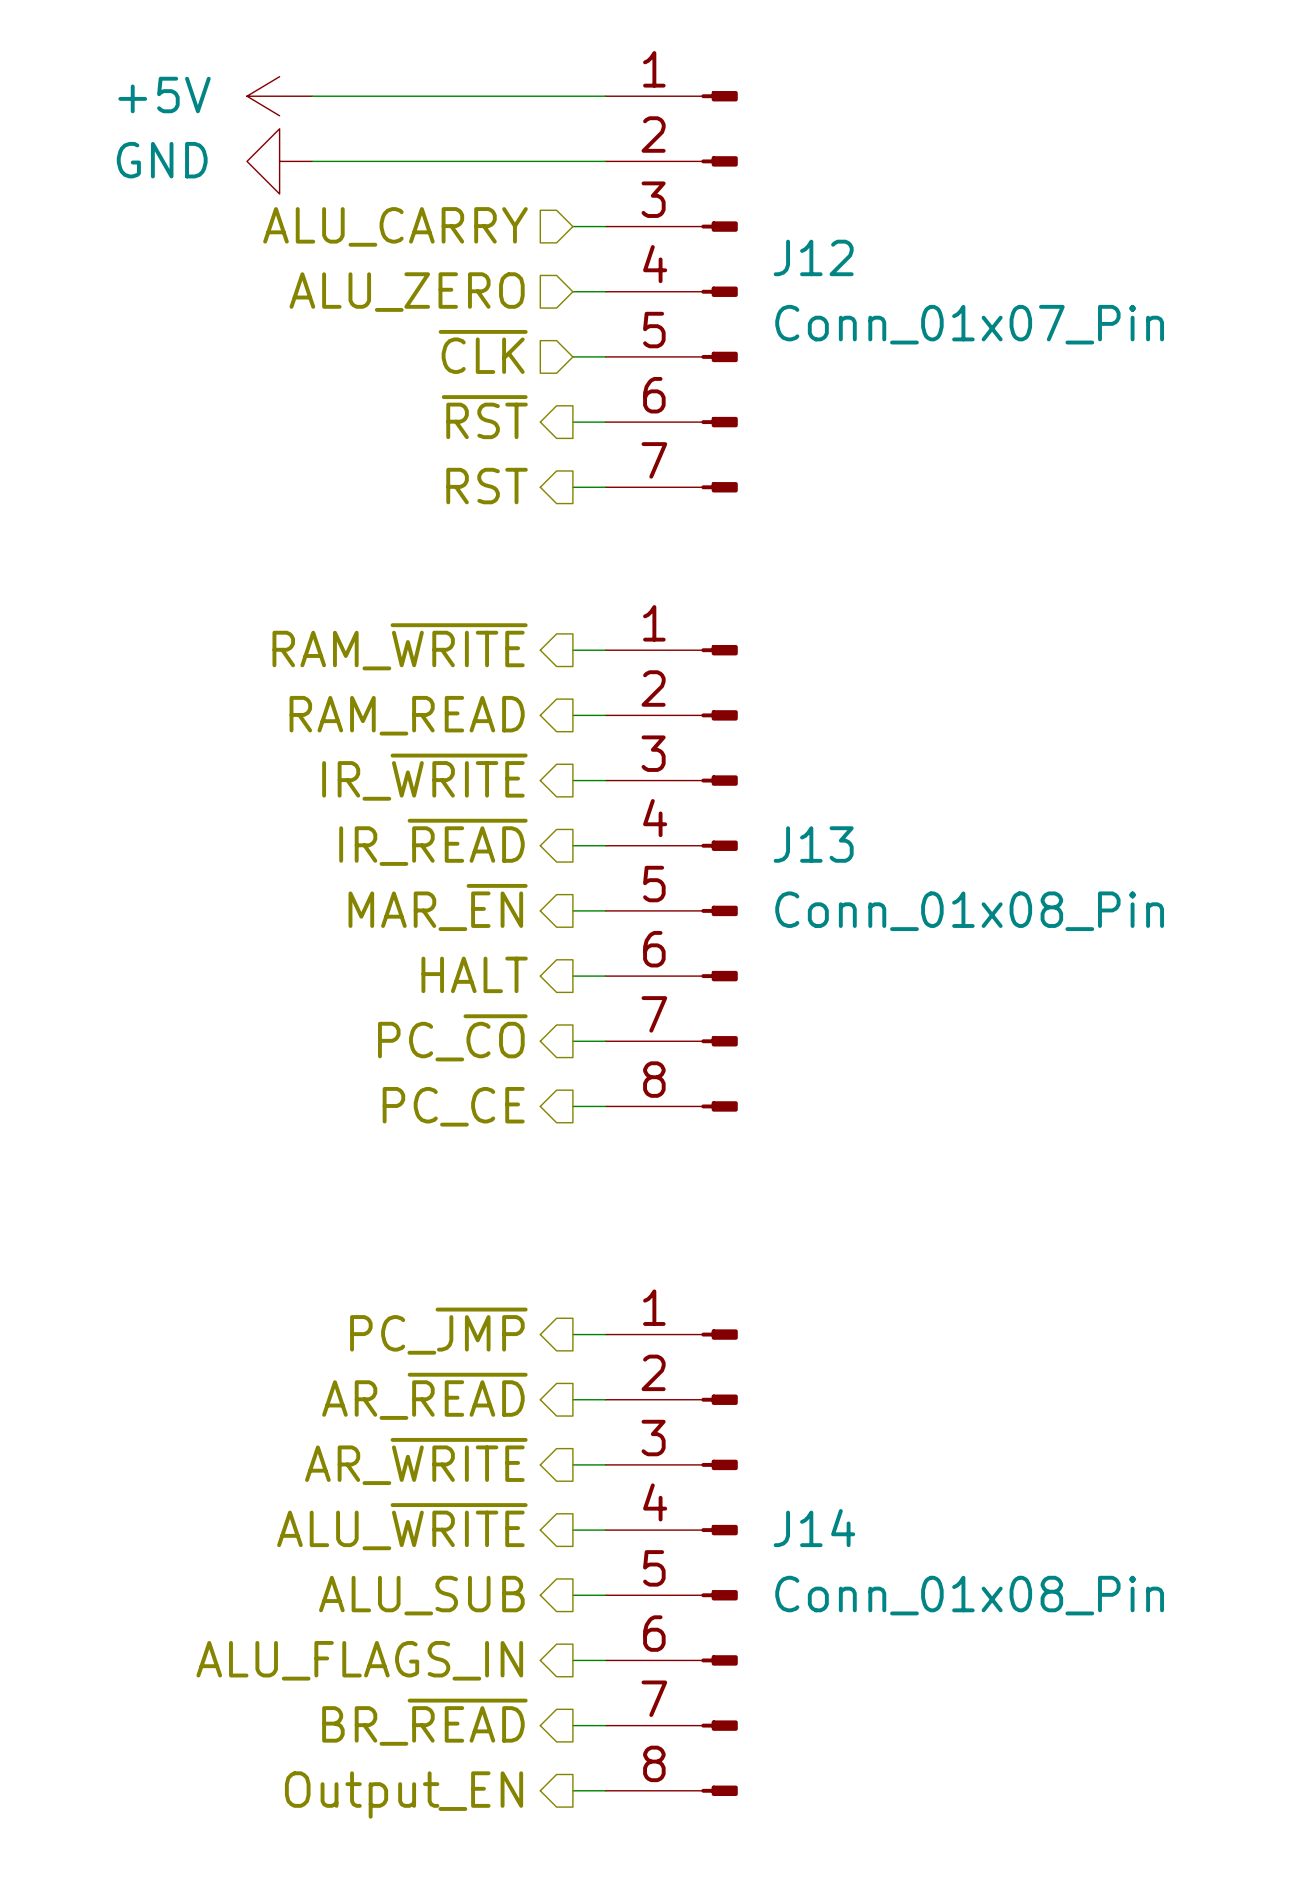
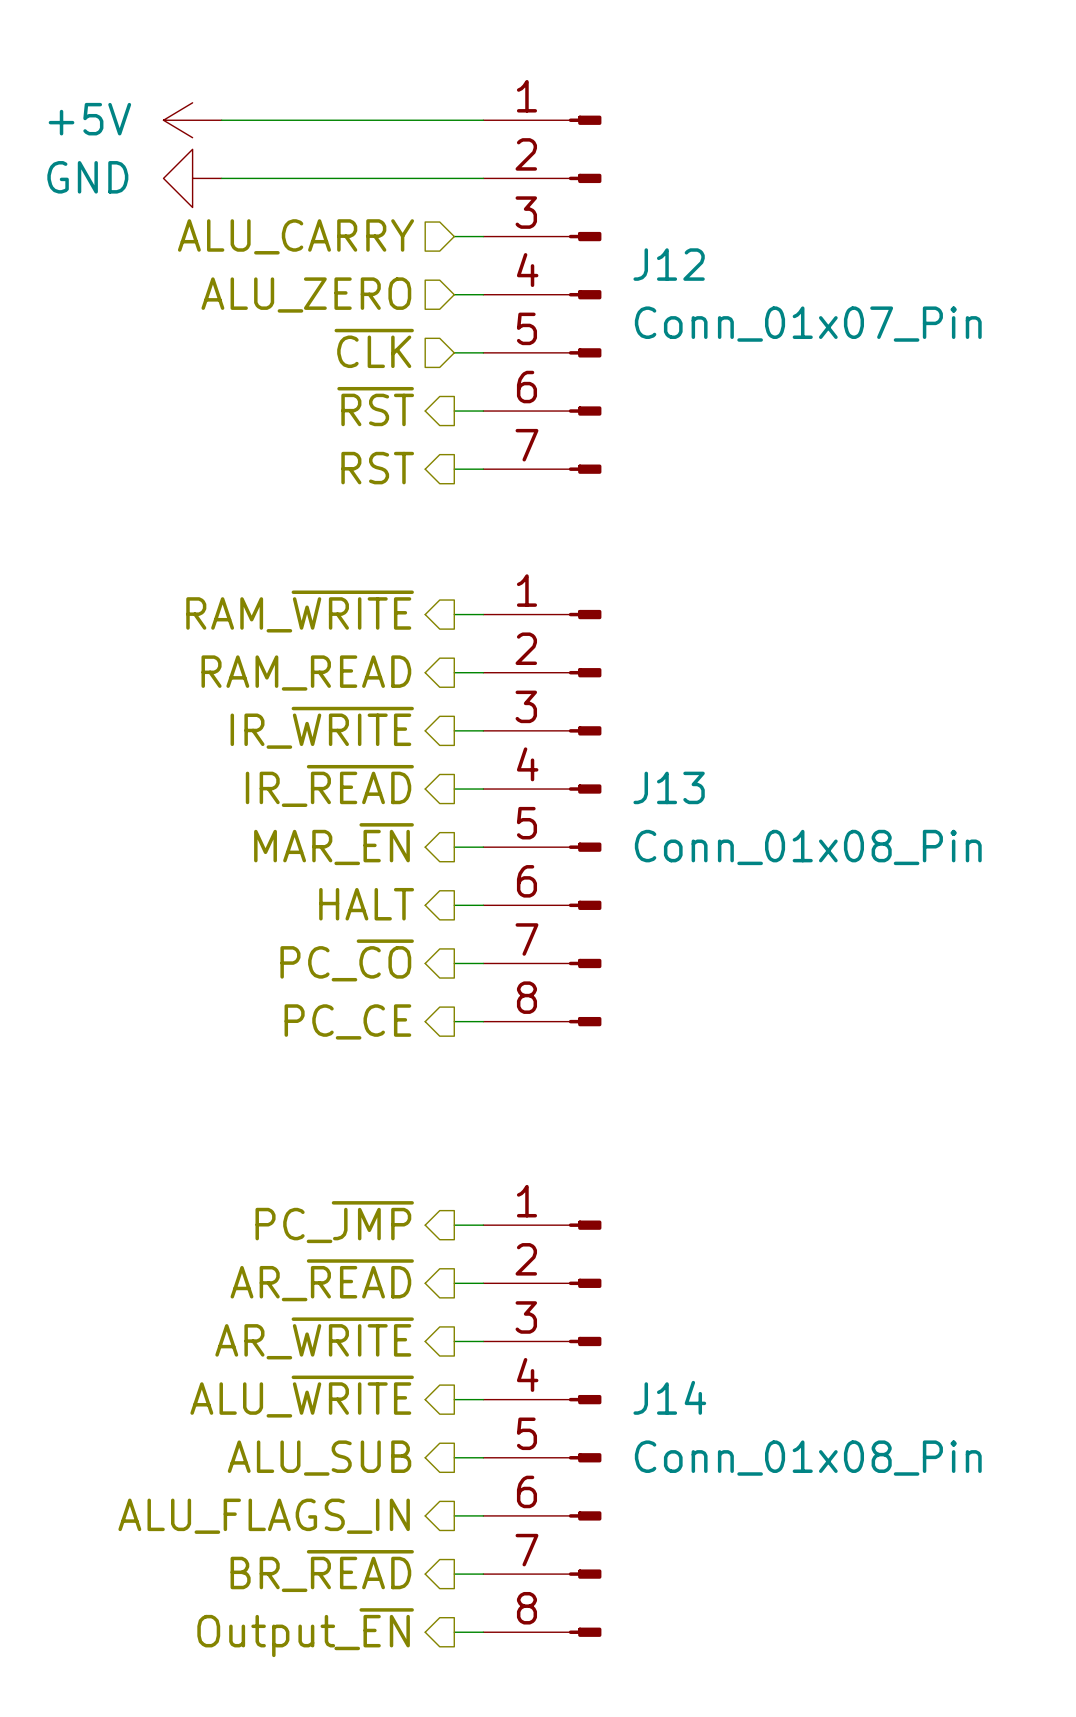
hierarchical label: Output_EN (404, 1795) -> Output_~{EN} (305, 1632)

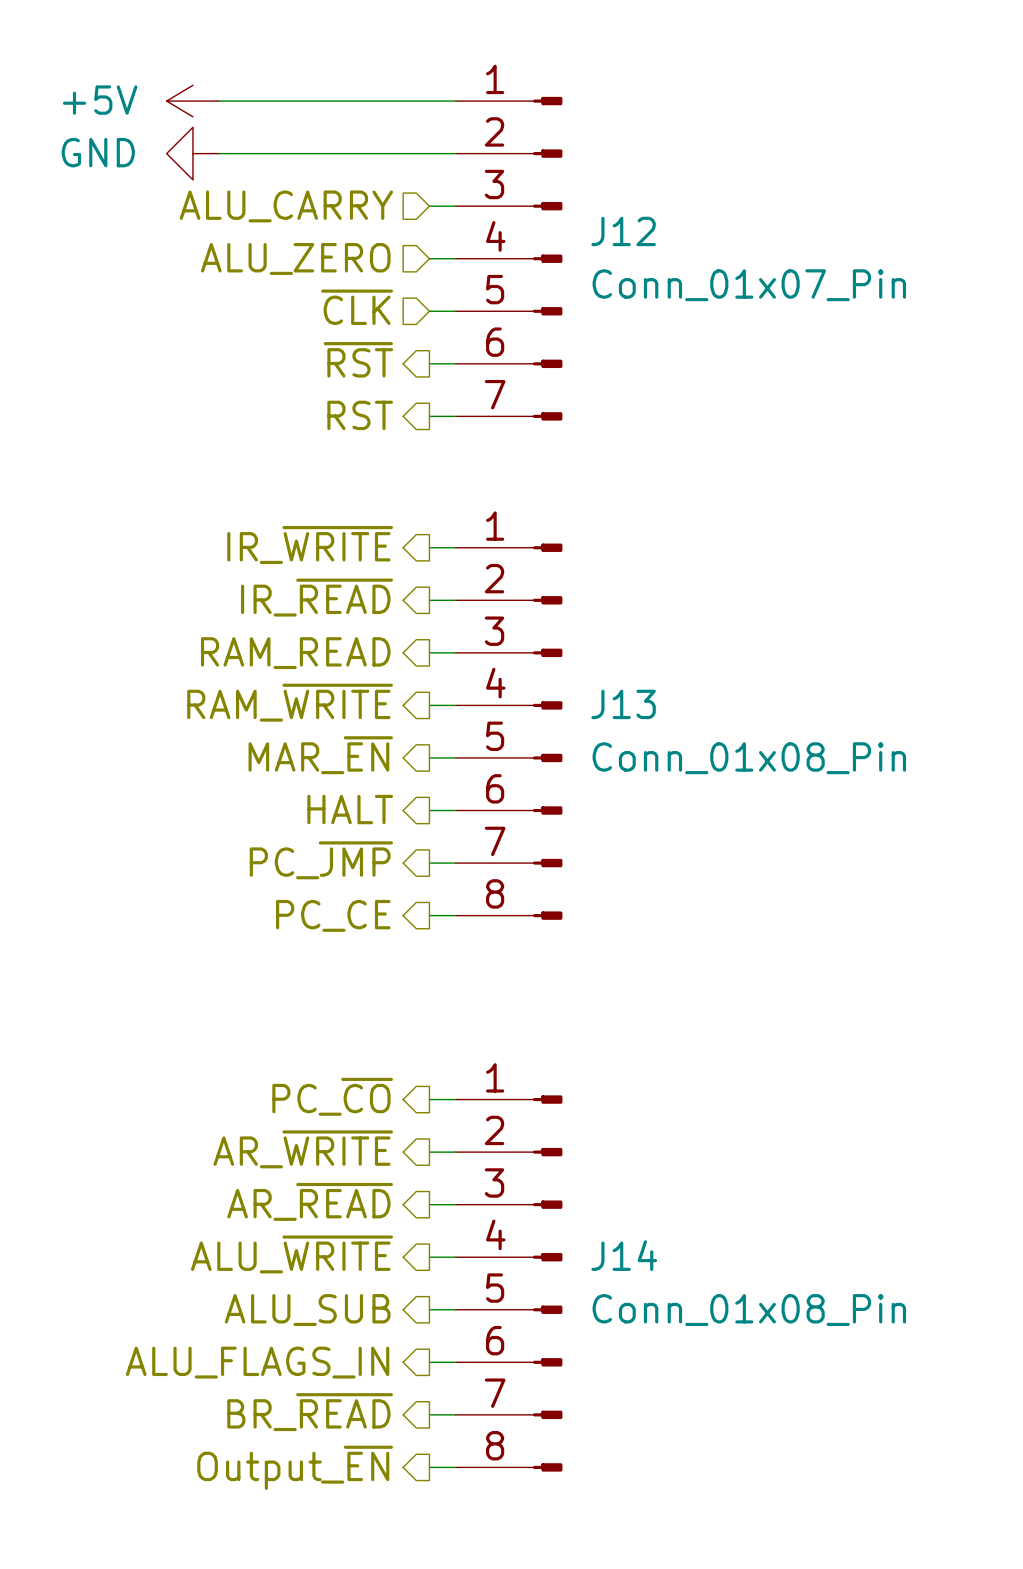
hierarchical label: RAM_~{WRITE} (300, 611) -> IR_~{WRITE} (310, 545)
hierarchical label: RAM_READ (306, 673) -> IR_~{READ} (316, 597)
hierarchical label: IR_~{WRITE} (322, 727) -> RAM_READ (295, 653)
hierarchical label: IR_~{READ} (329, 785) -> RAM_~{WRITE} (290, 702)
hierarchical label: PC_~{CO} (347, 960) -> PC_~{JMP} (321, 860)
hierarchical label: PC_~{JMP} (334, 1222) -> PC_~{CO} (332, 1096)
hierarchical label: AR_~{READ} (322, 1280) -> AR_~{WRITE} (303, 1149)
hierarchical label: AR_~{WRITE} (314, 1338) -> AR_~{READ} (310, 1201)

